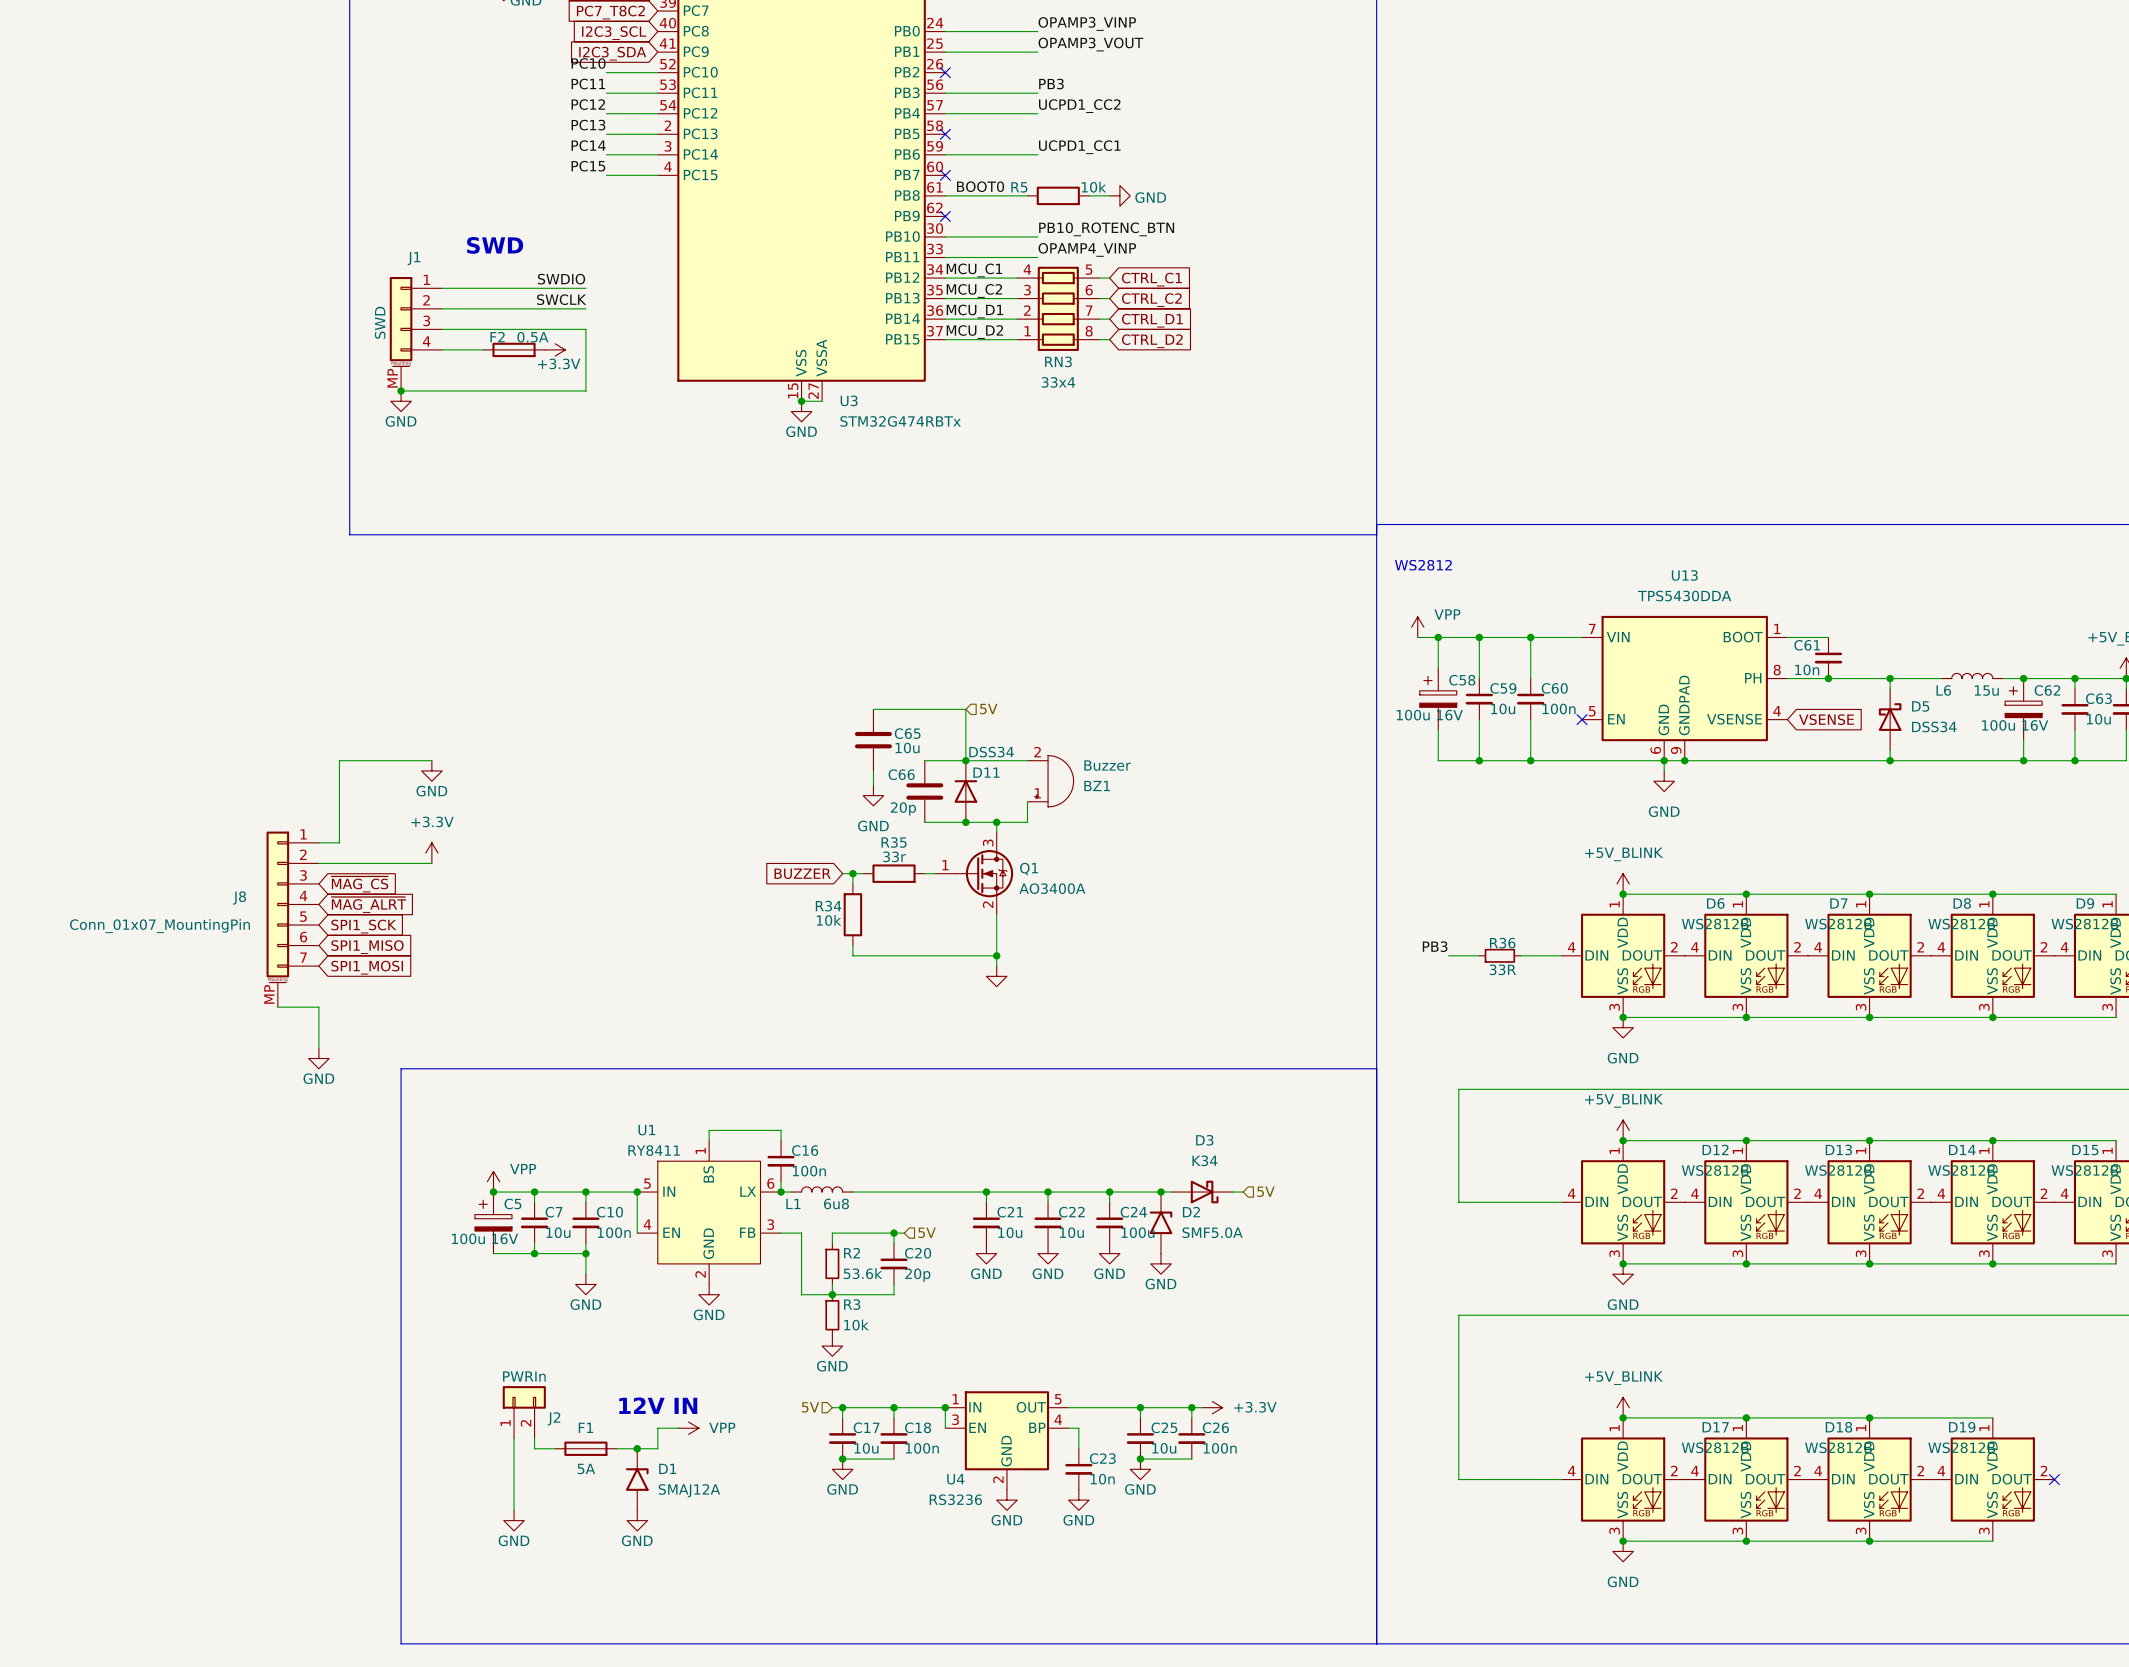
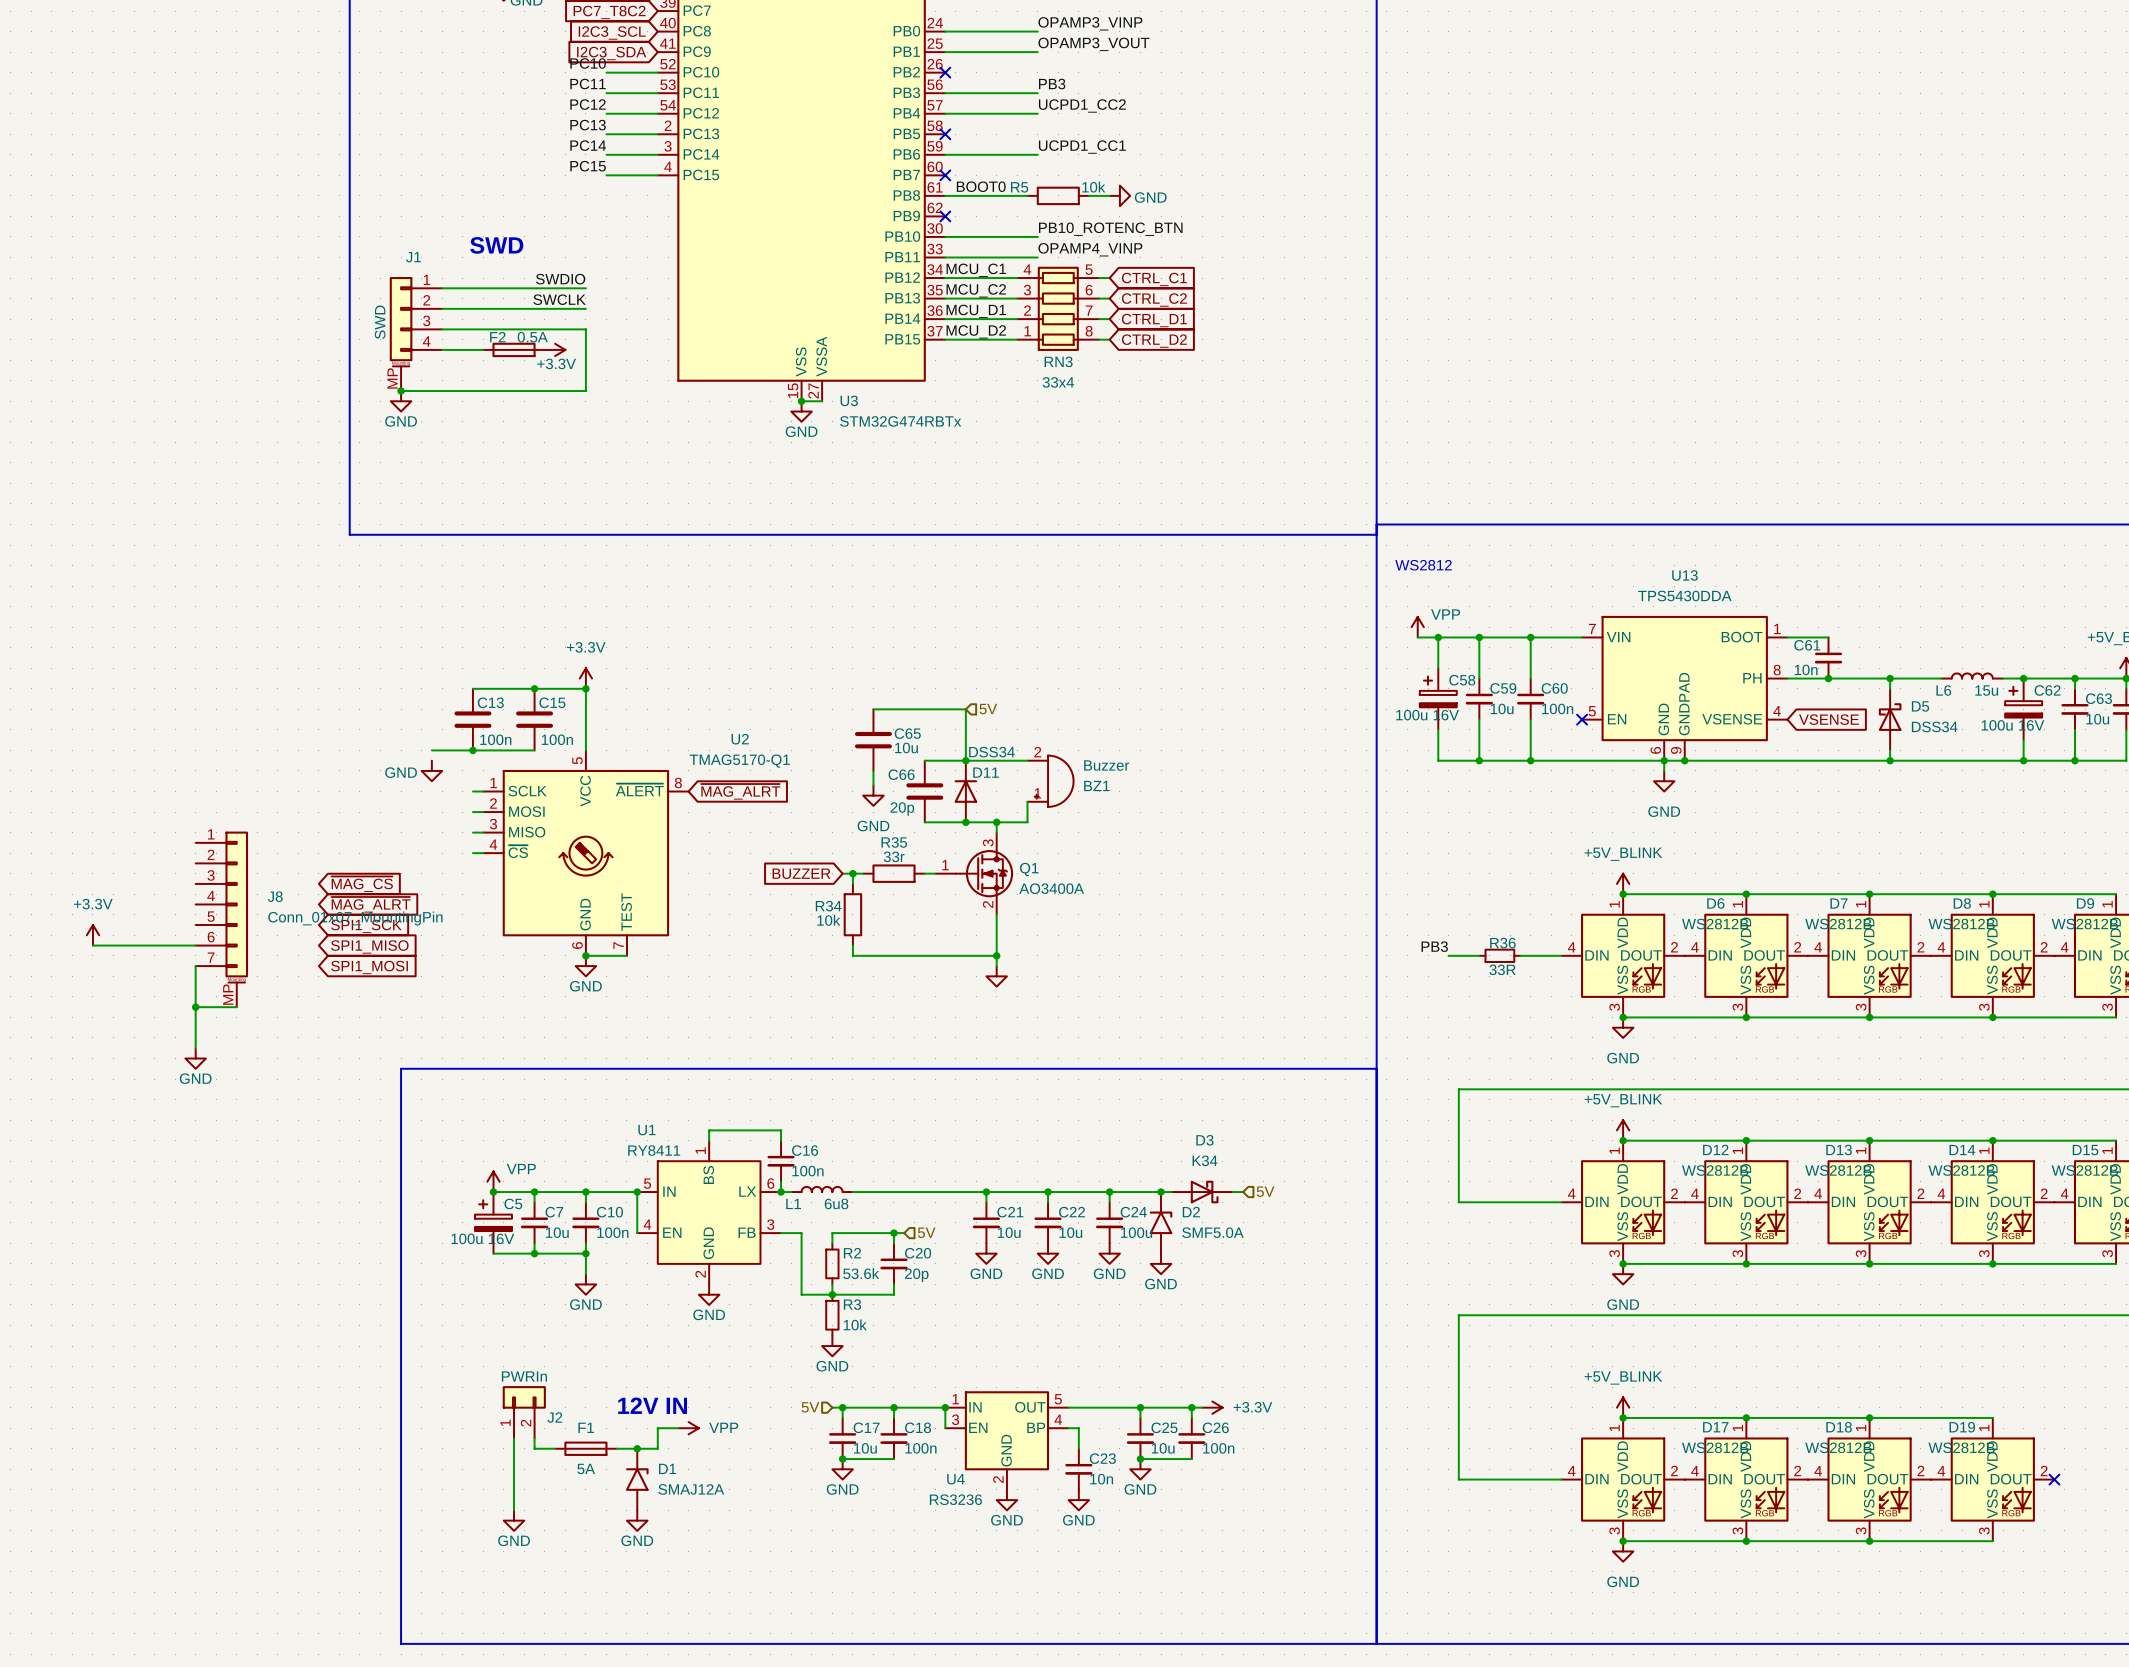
power symbol: none -> +3.3V (585, 678)
wire: none -> (472, 688) (585, 688) (585, 750)
junction: none -> (534, 688)
junction: none -> (585, 688)
C13: none -> 100n (472, 719)
C15: none -> 100n (534, 719)
wire: none -> (431, 750) (534, 750)
junction: none -> (472, 750)
wire: (431, 760) (339, 760) (339, 842) (318, 842) -> none
power symbol text position: GND (431, 791) -> GND (401, 772)
wire: none -> (472, 791) (483, 791)
global label: none -> ~{MAG_ALRT} (740, 791)
wire: none -> (472, 812) (483, 812)
wire: none -> (472, 832) (483, 832)
power symbol: +3.3V (431, 853) -> none
wire: none -> (472, 853) (483, 853)
U2: none -> TMAG5170-Q1 (585, 853)
wire: (318, 863) (431, 863) -> none
J8 flip: as is (277, 907) -> left-right (236, 907)
power symbol: none -> +3.3V (92, 935)
wire: none -> (92, 945) (195, 945)
wire: none -> (585, 955) (626, 955)
junction: none -> (585, 955)
wire: none -> (195, 966) (195, 1048)
power symbol: none -> GND (585, 966)
wire: none -> (195, 1007) (236, 1007)
junction: none -> (195, 1007)
wire: (277, 1007) (318, 1007) (318, 1048) -> none
power symbol position: GND (318, 1058) -> GND (195, 1058)

